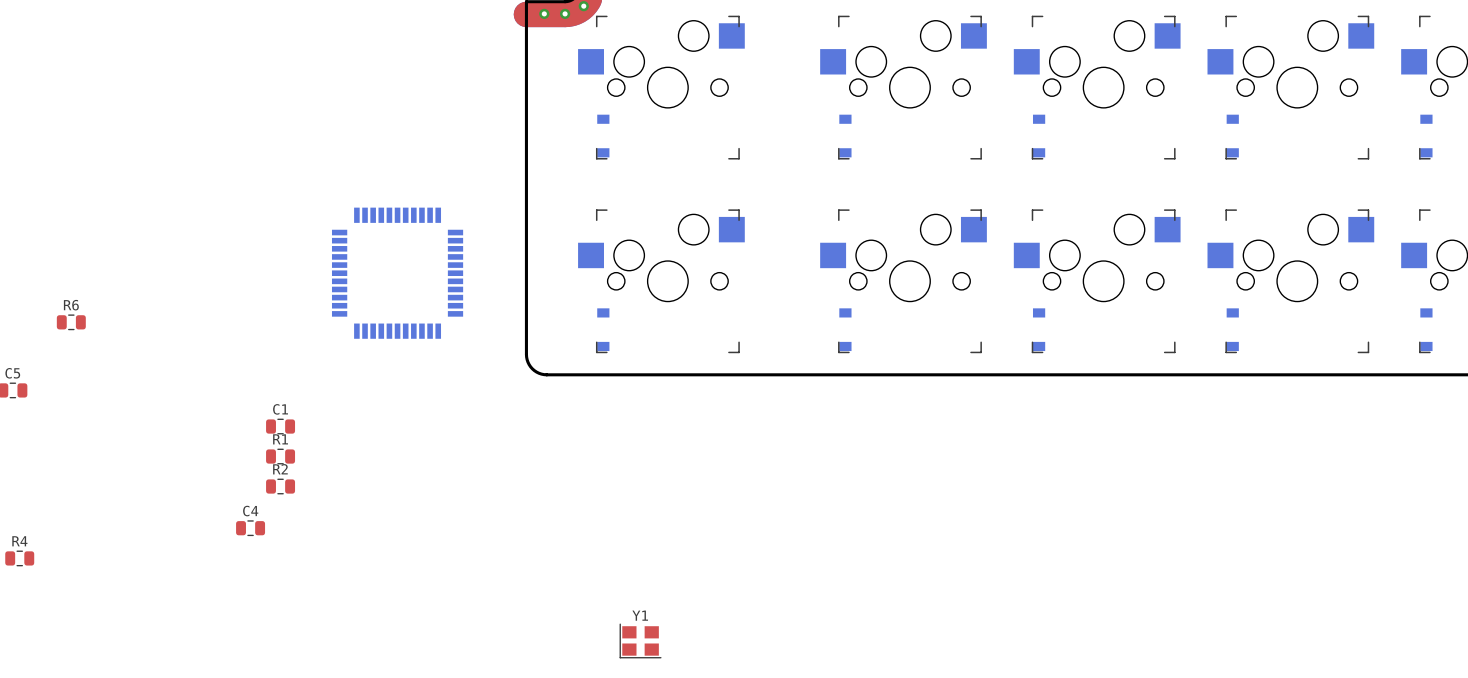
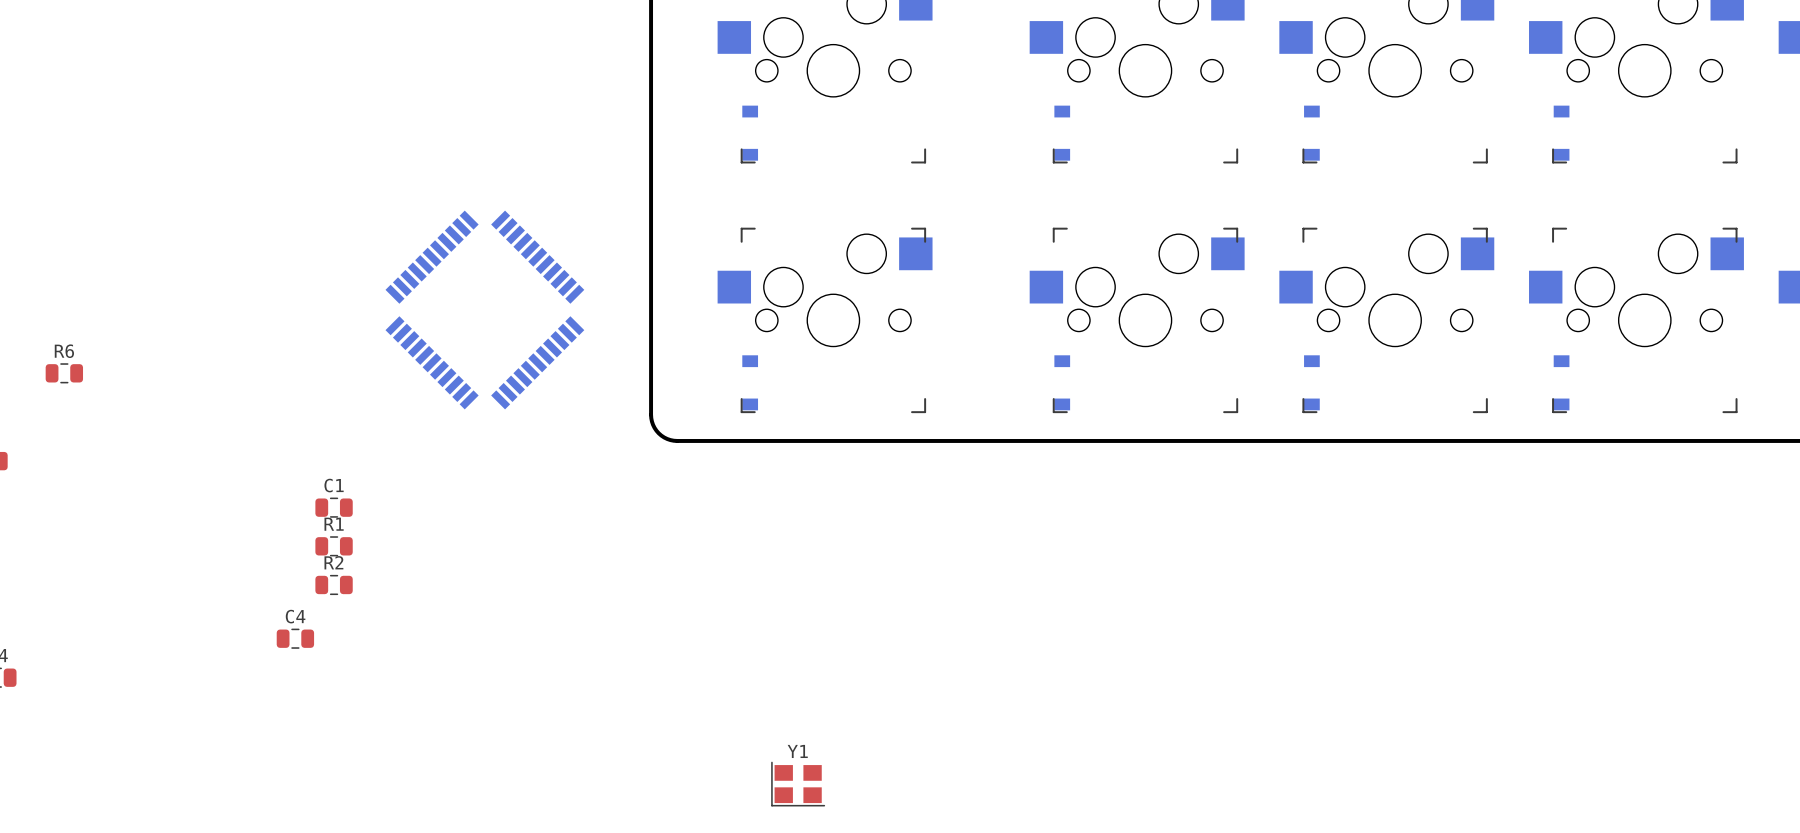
part rotation: 0° (397, 273) -> 45° clockwise (484, 310)

